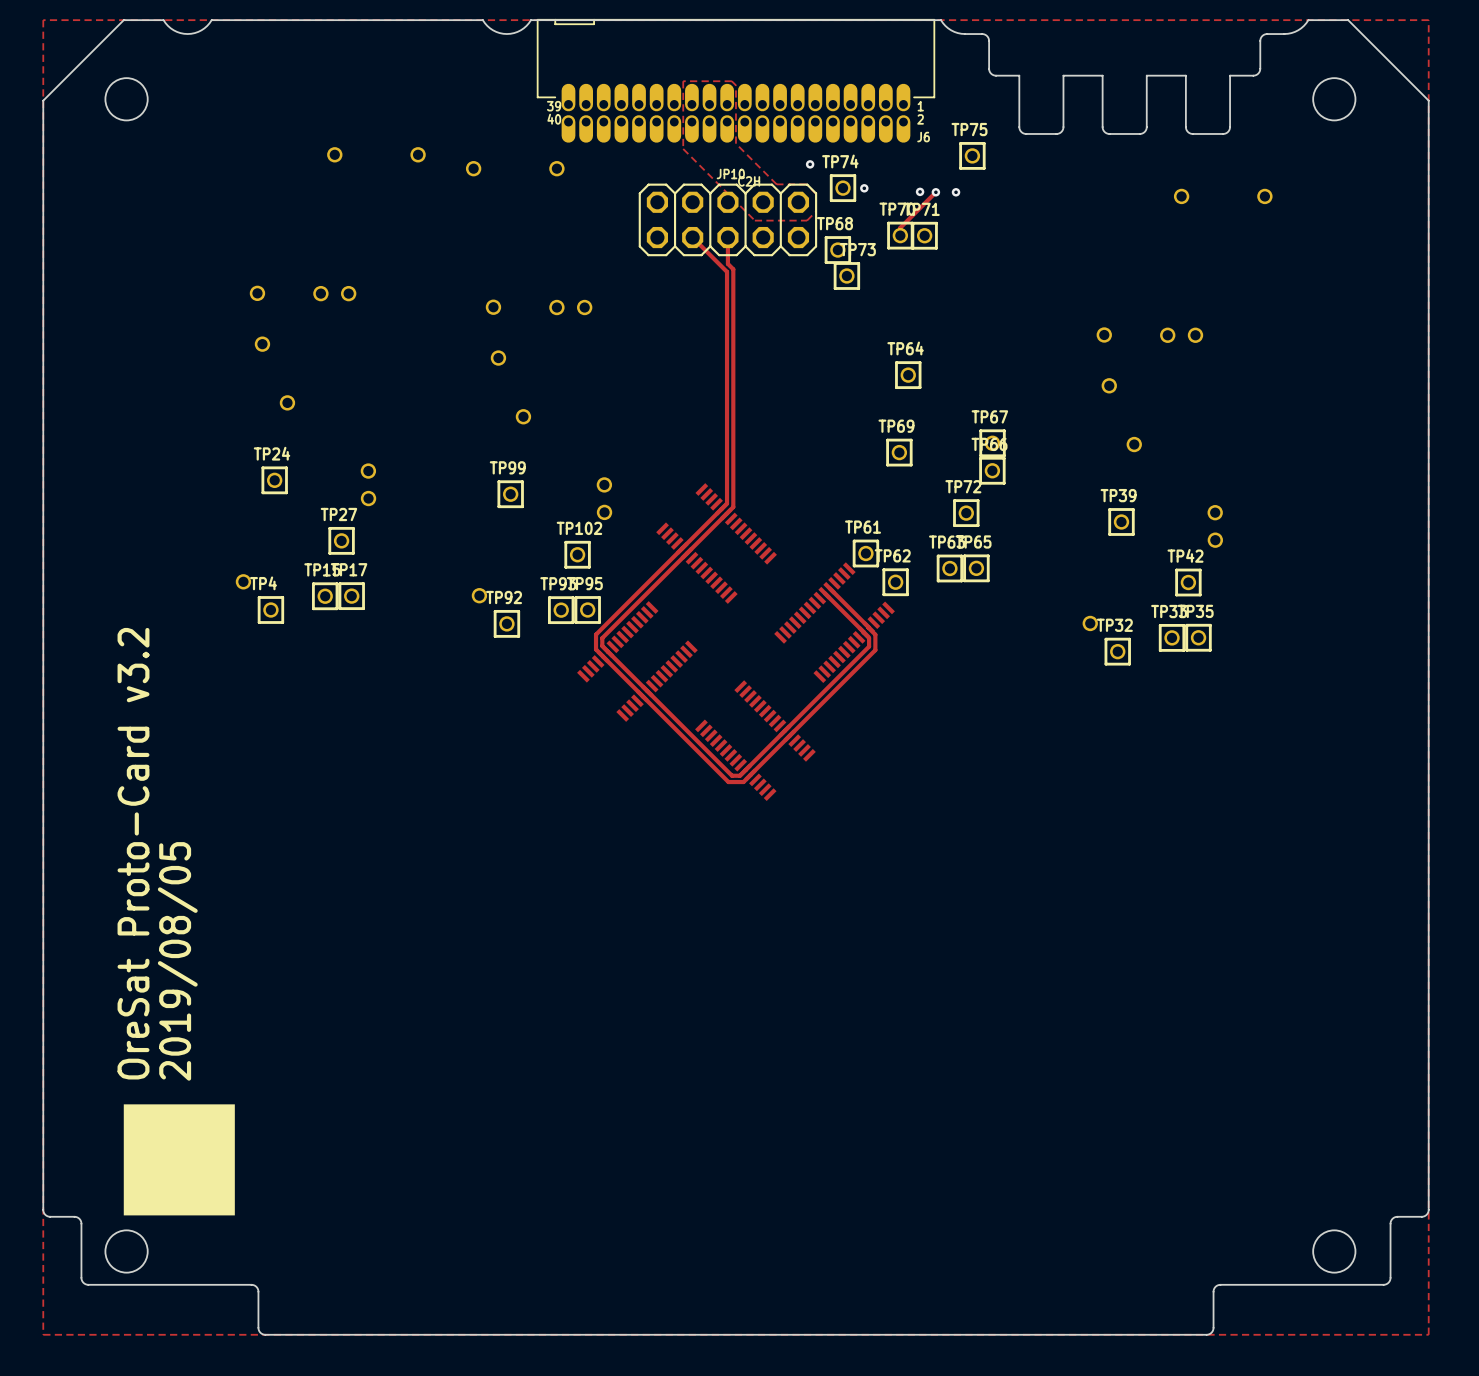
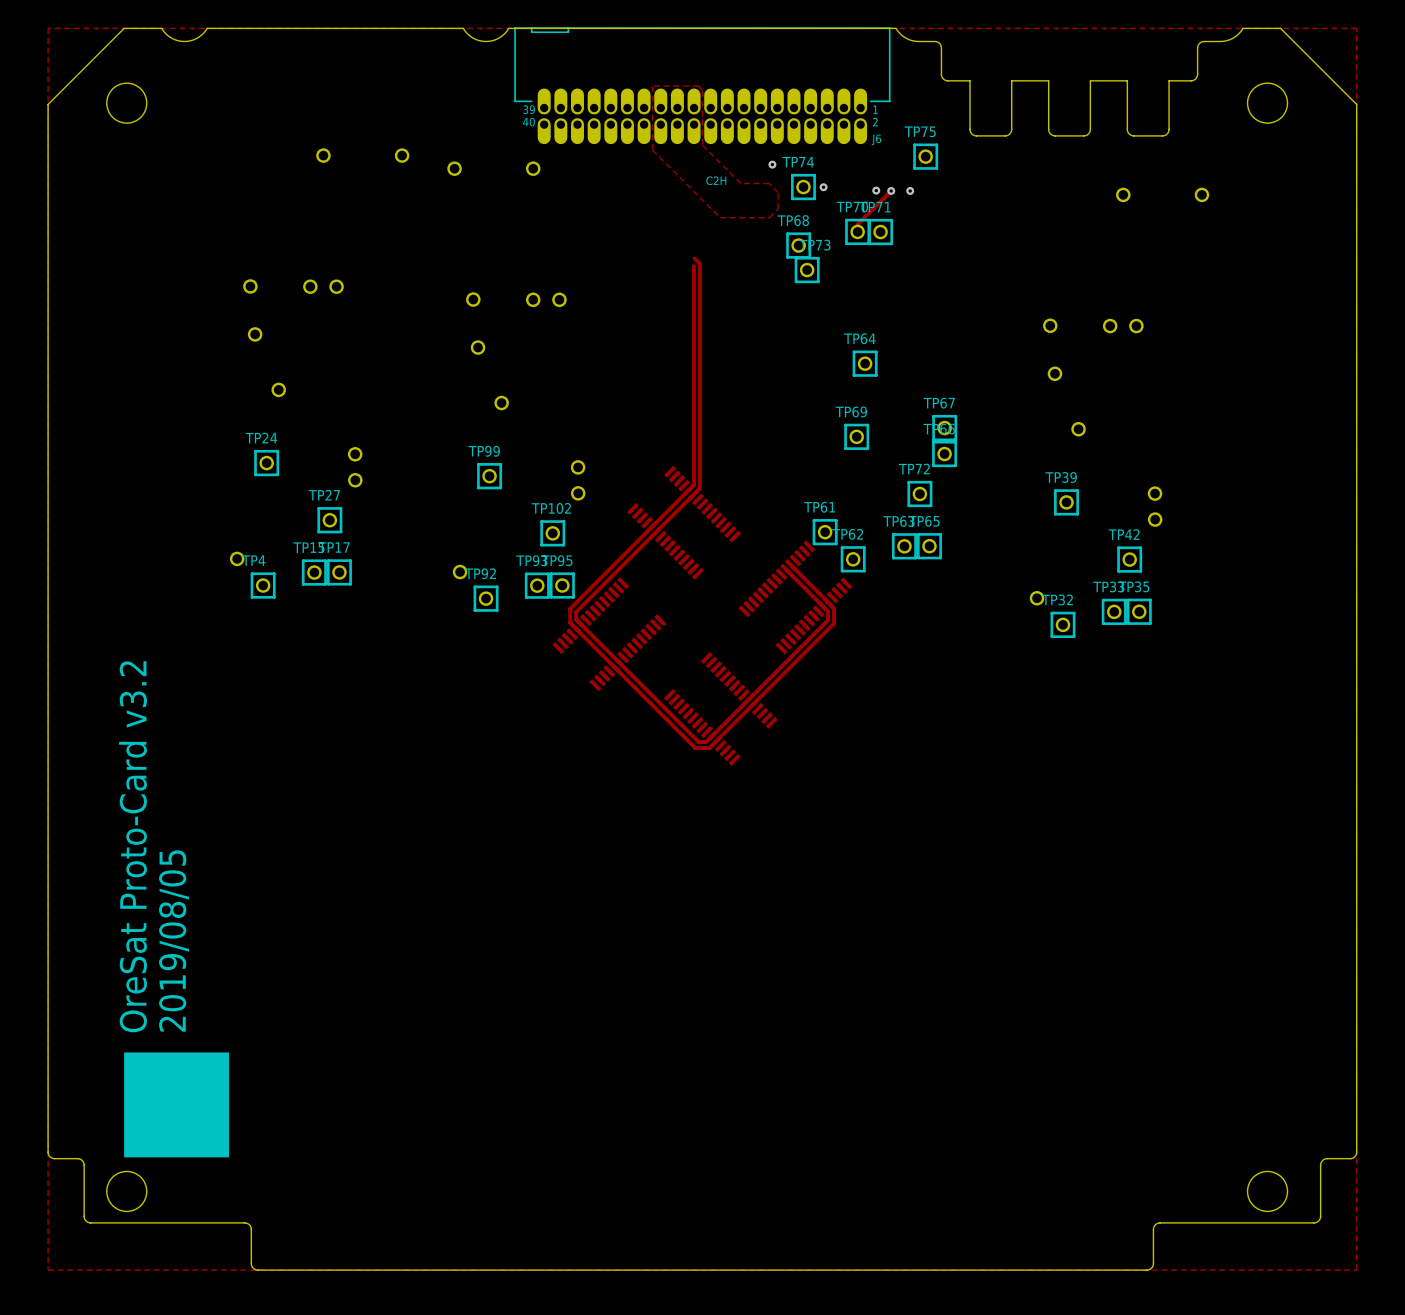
JP10: (727, 219) -> none
track: (692, 237) (727, 271) -> none
track: (727, 237) (727, 263) -> none

